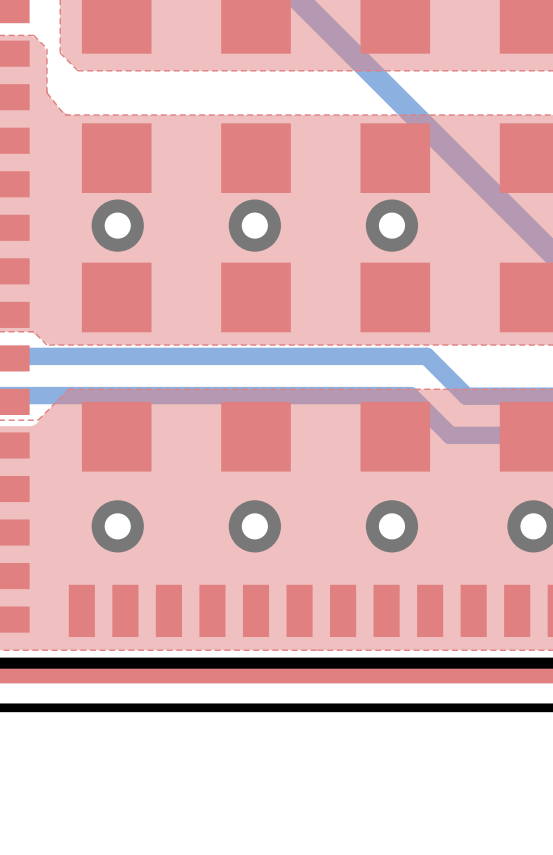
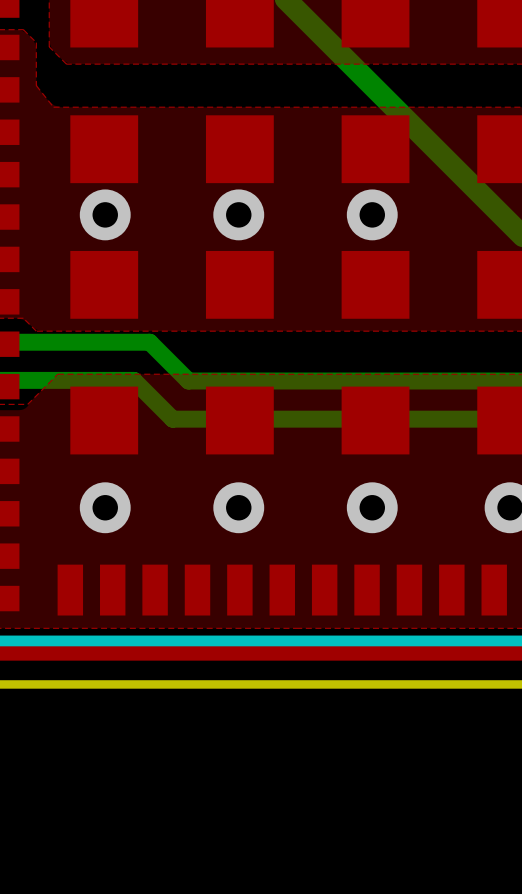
bottom track: (163, 356) (426, 356) (466, 396) -> (149, 342) (188, 381) (444, 381)
bottom track: (147, 395) (410, 395) (450, 435) -> (133, 380) (172, 419) (428, 419)

